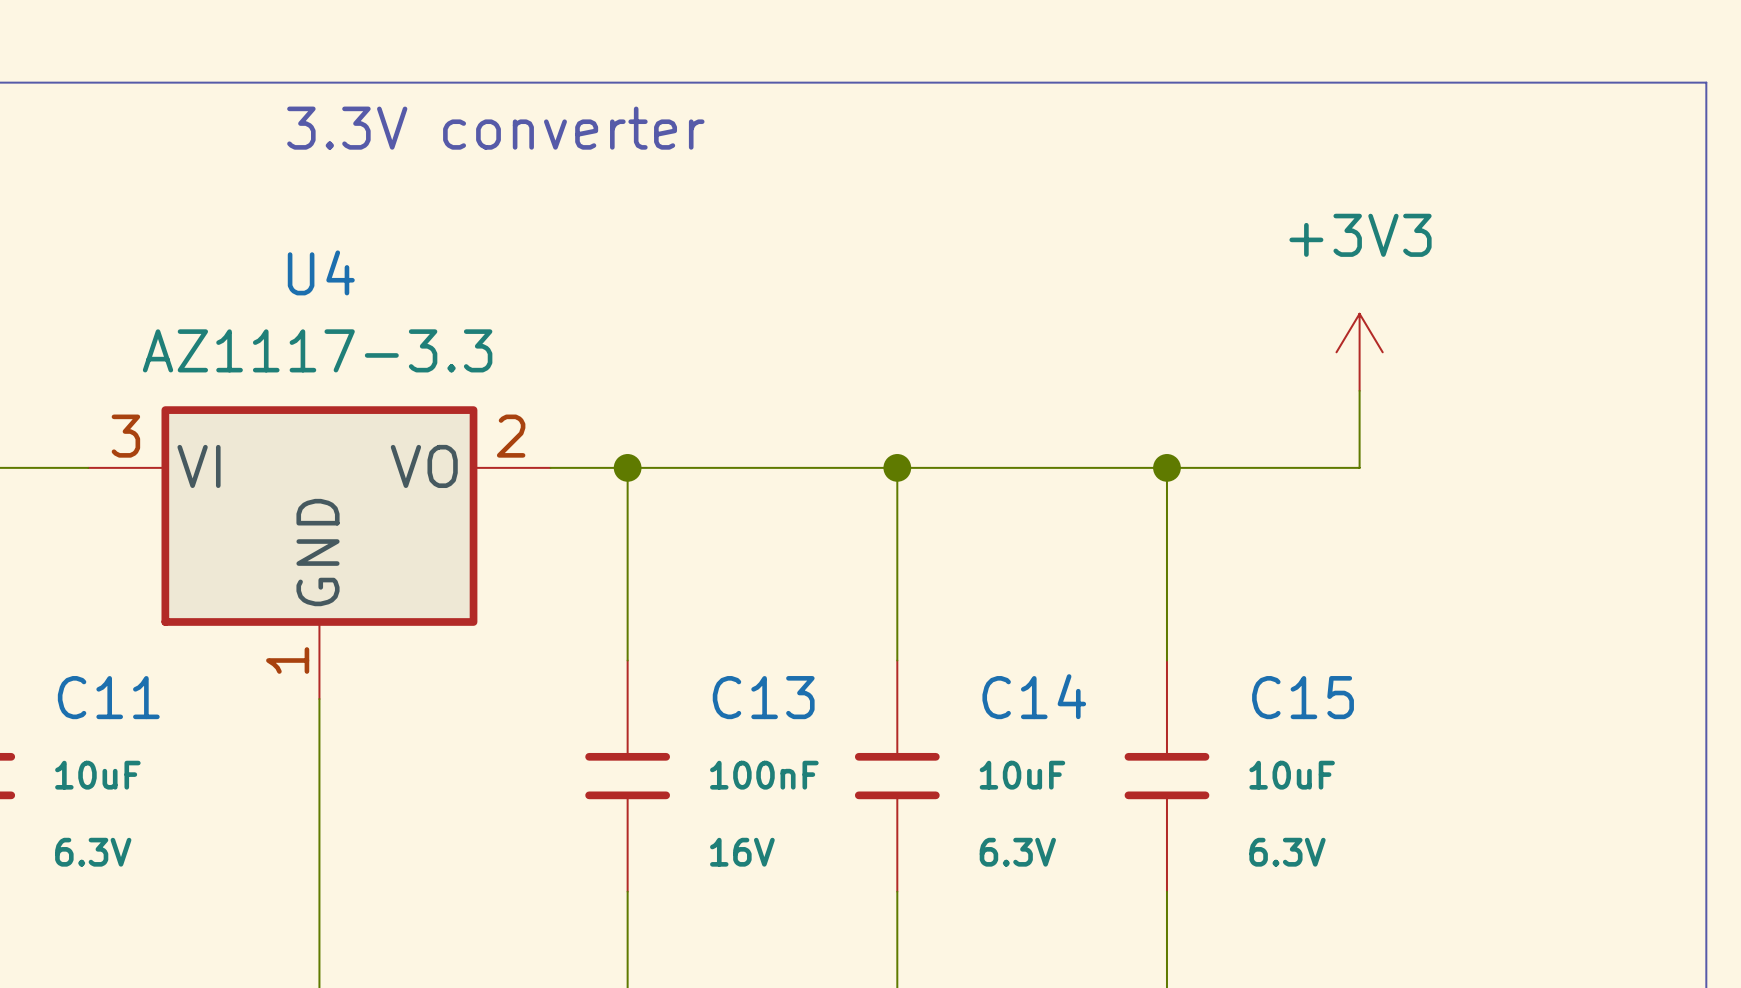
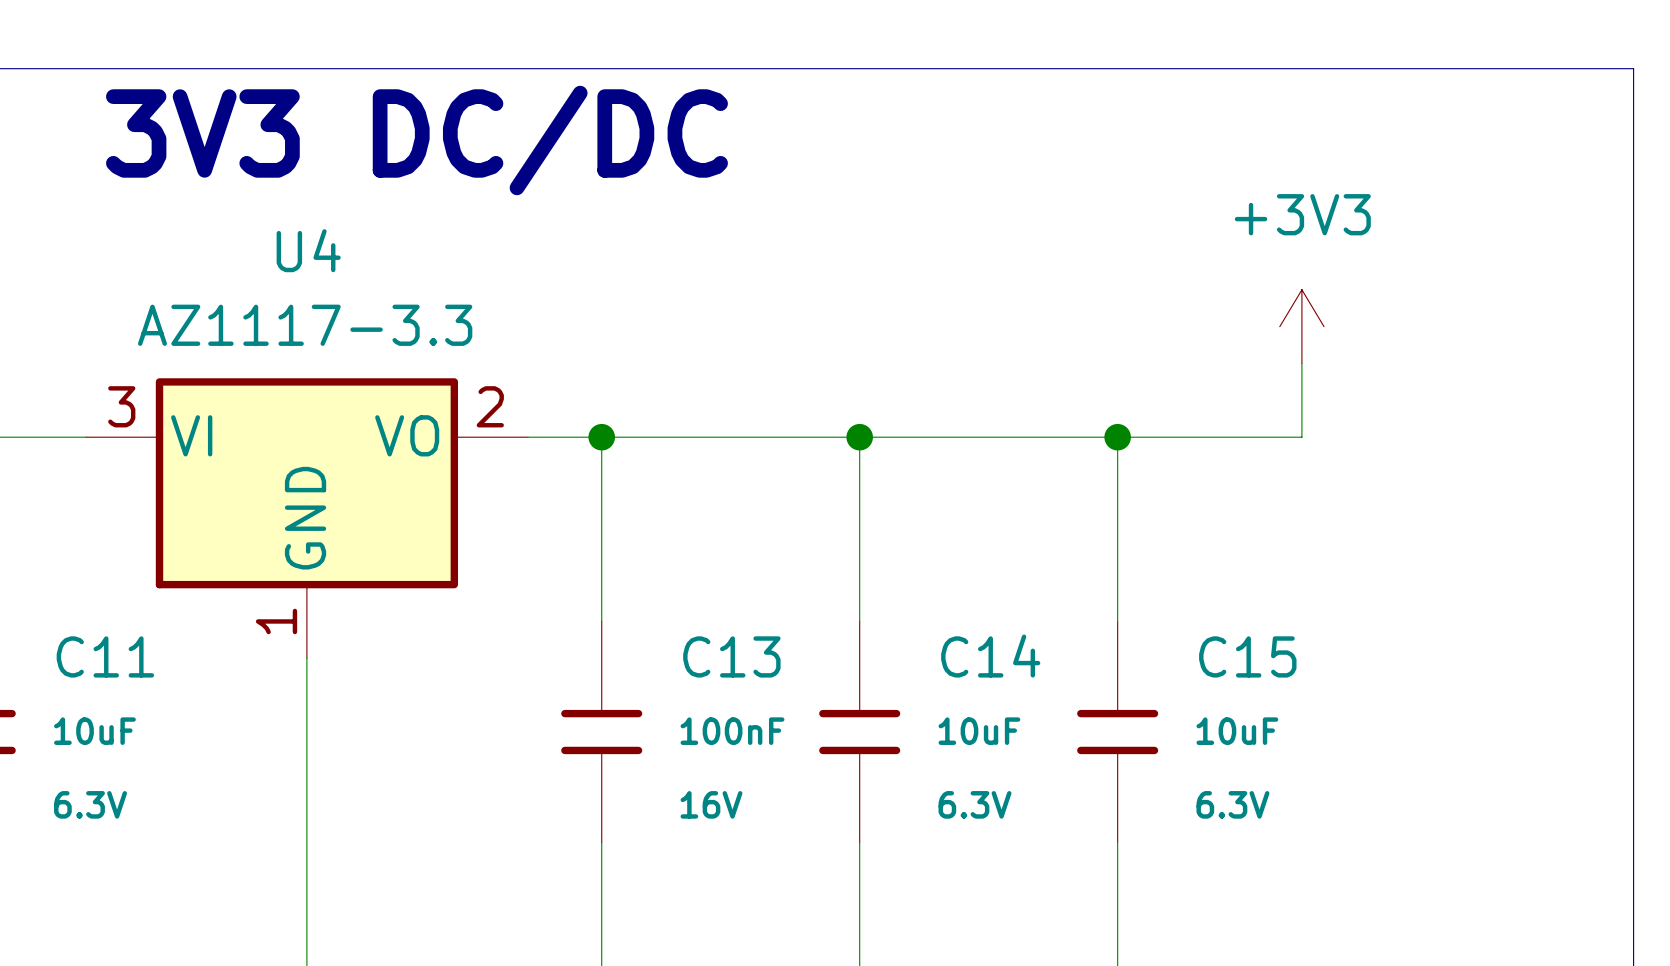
text: 3.3V converter (495, 128) -> none
text: none -> 3V3 DC/DC (416, 140)

